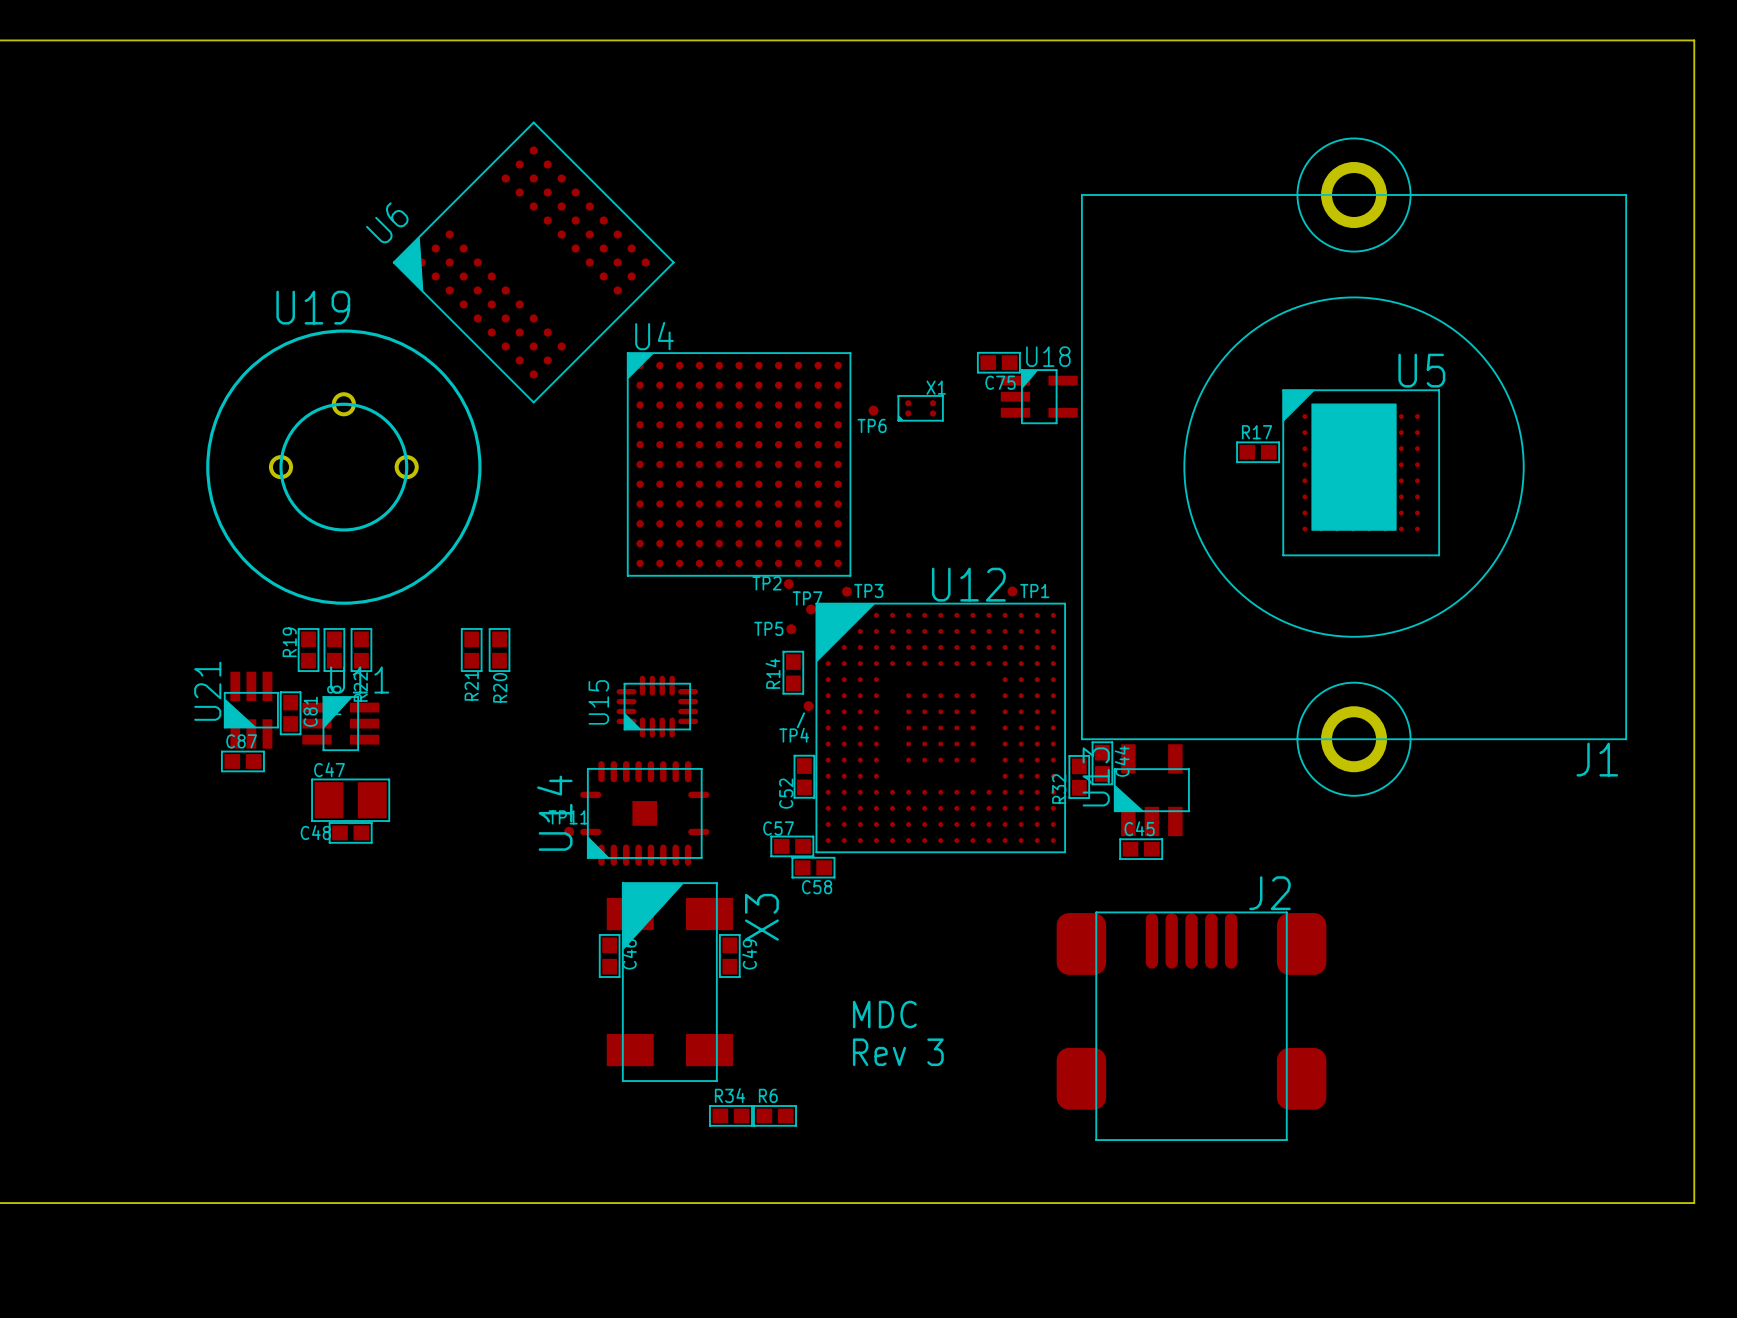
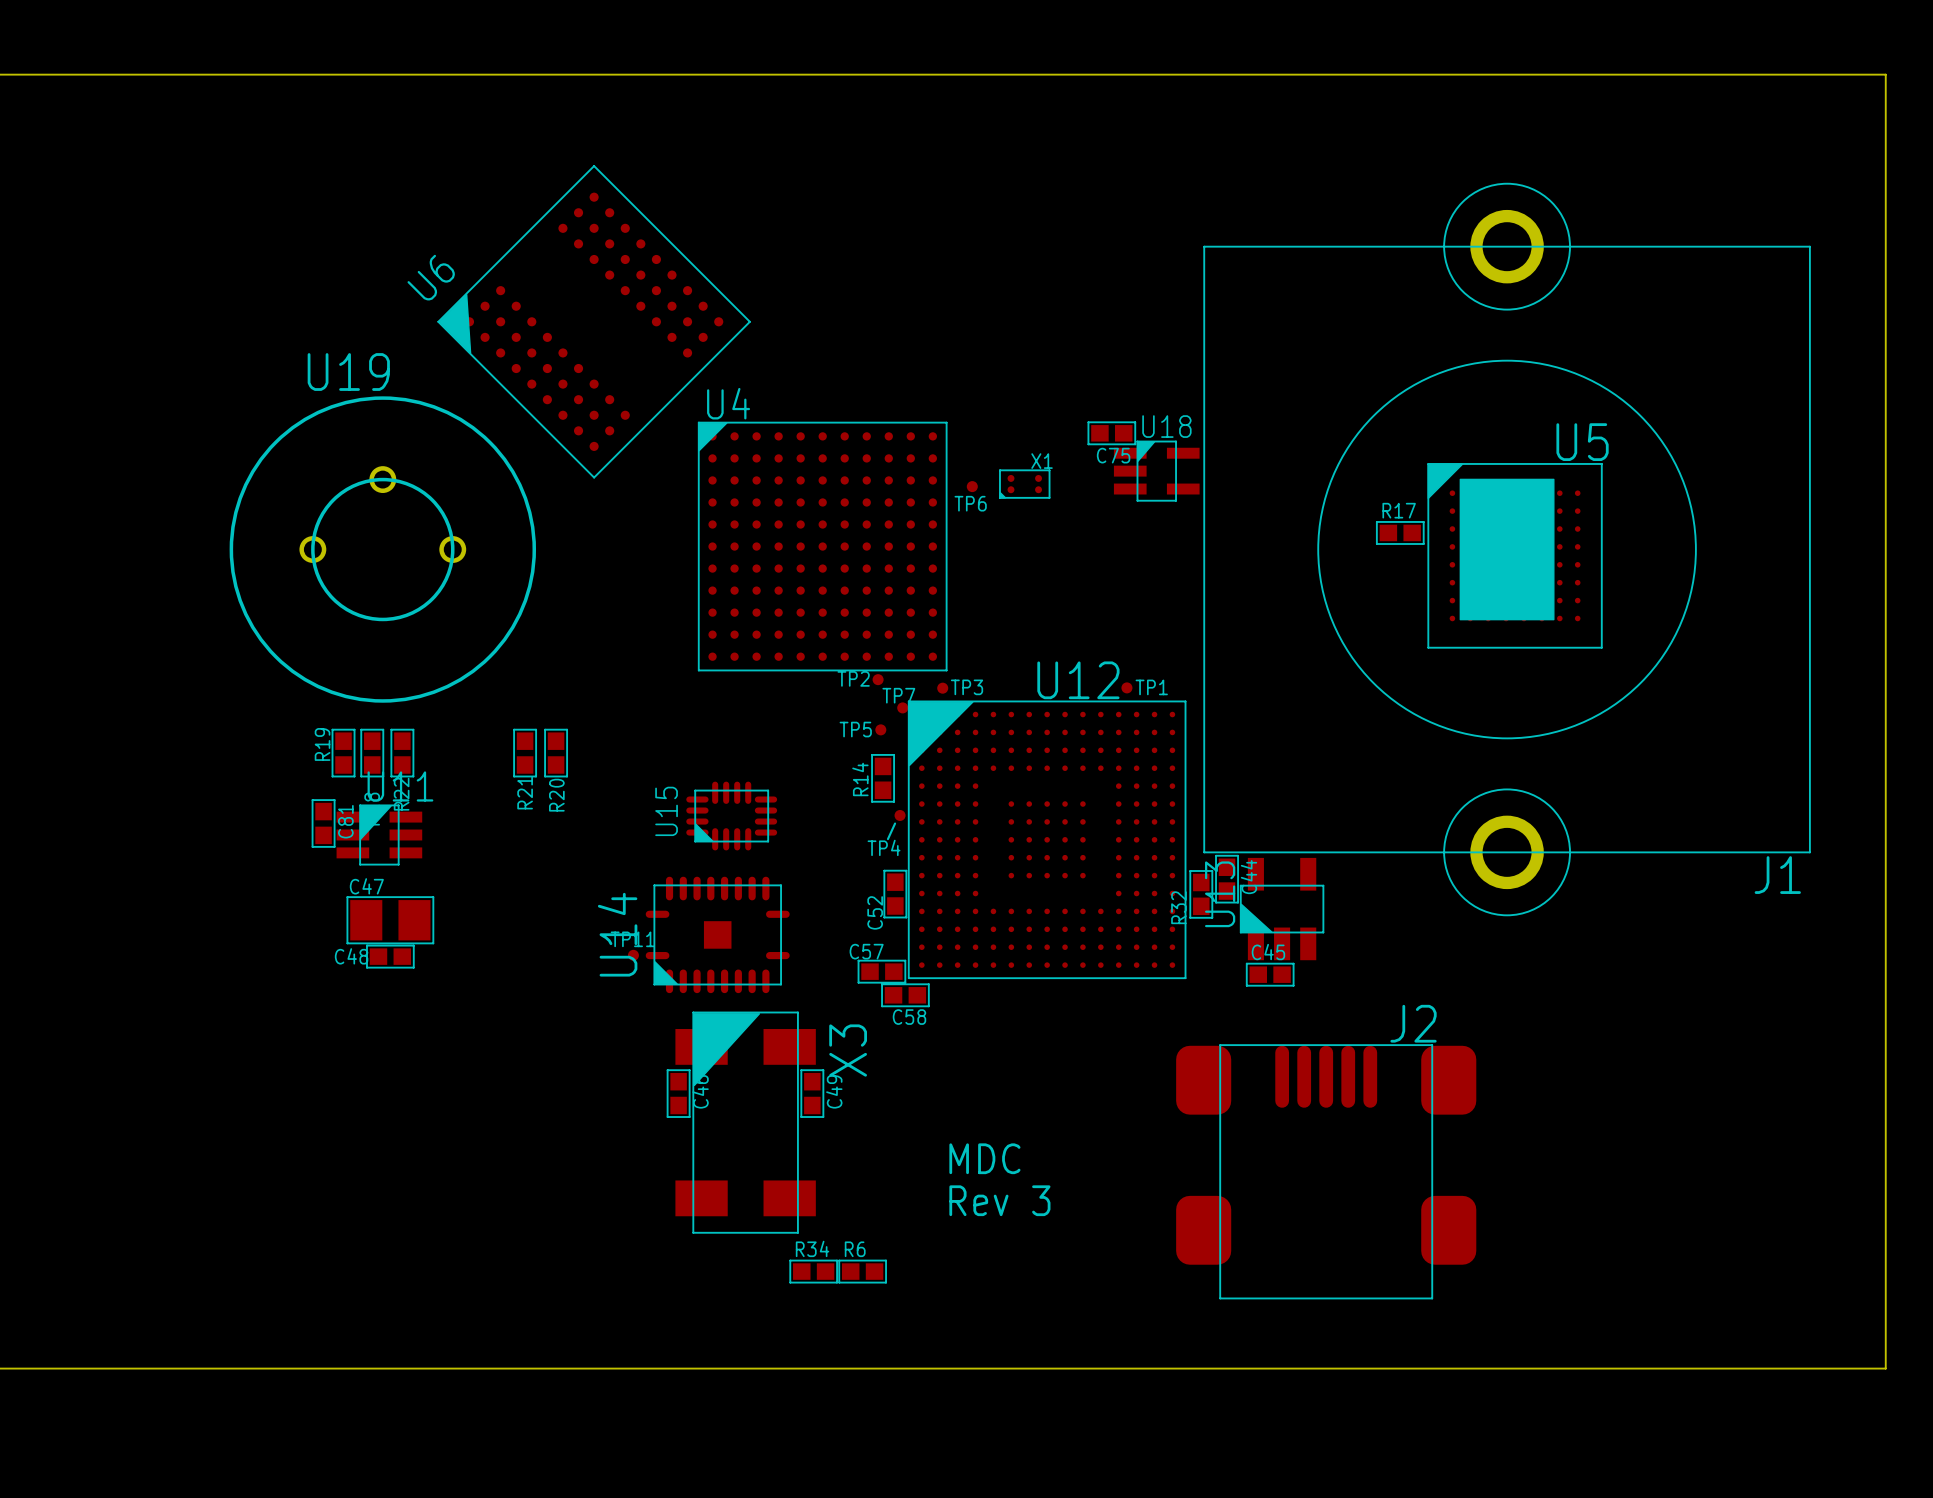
U21: (251, 710) -> none
C87: (242, 761) -> none

